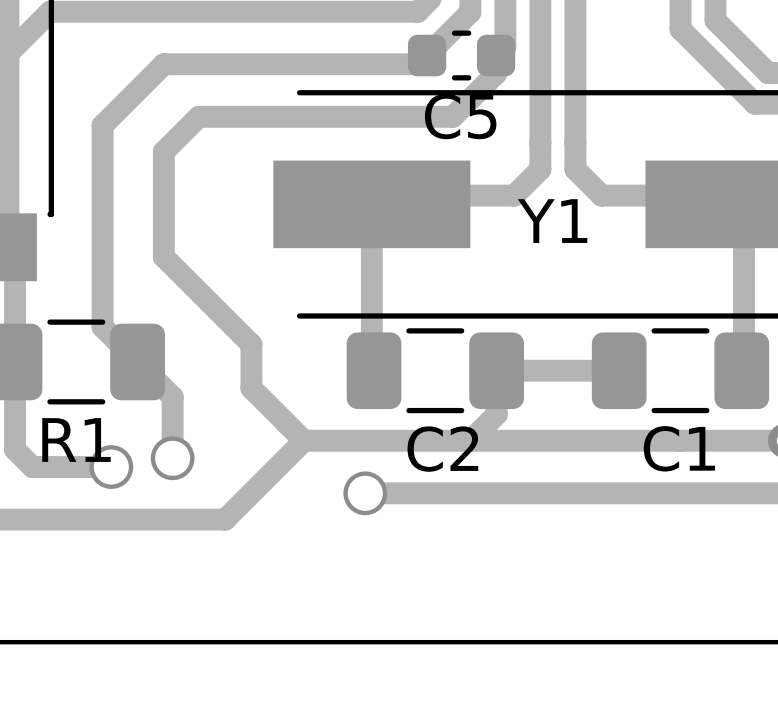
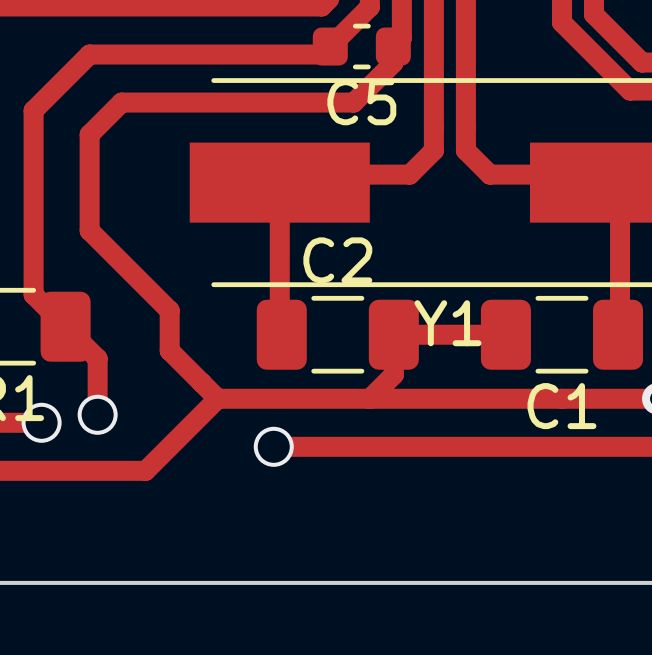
Y1 name position: Y1 (552, 221) -> Y1 (447, 323)
C2 name position: C2 (442, 449) -> C2 (337, 260)

